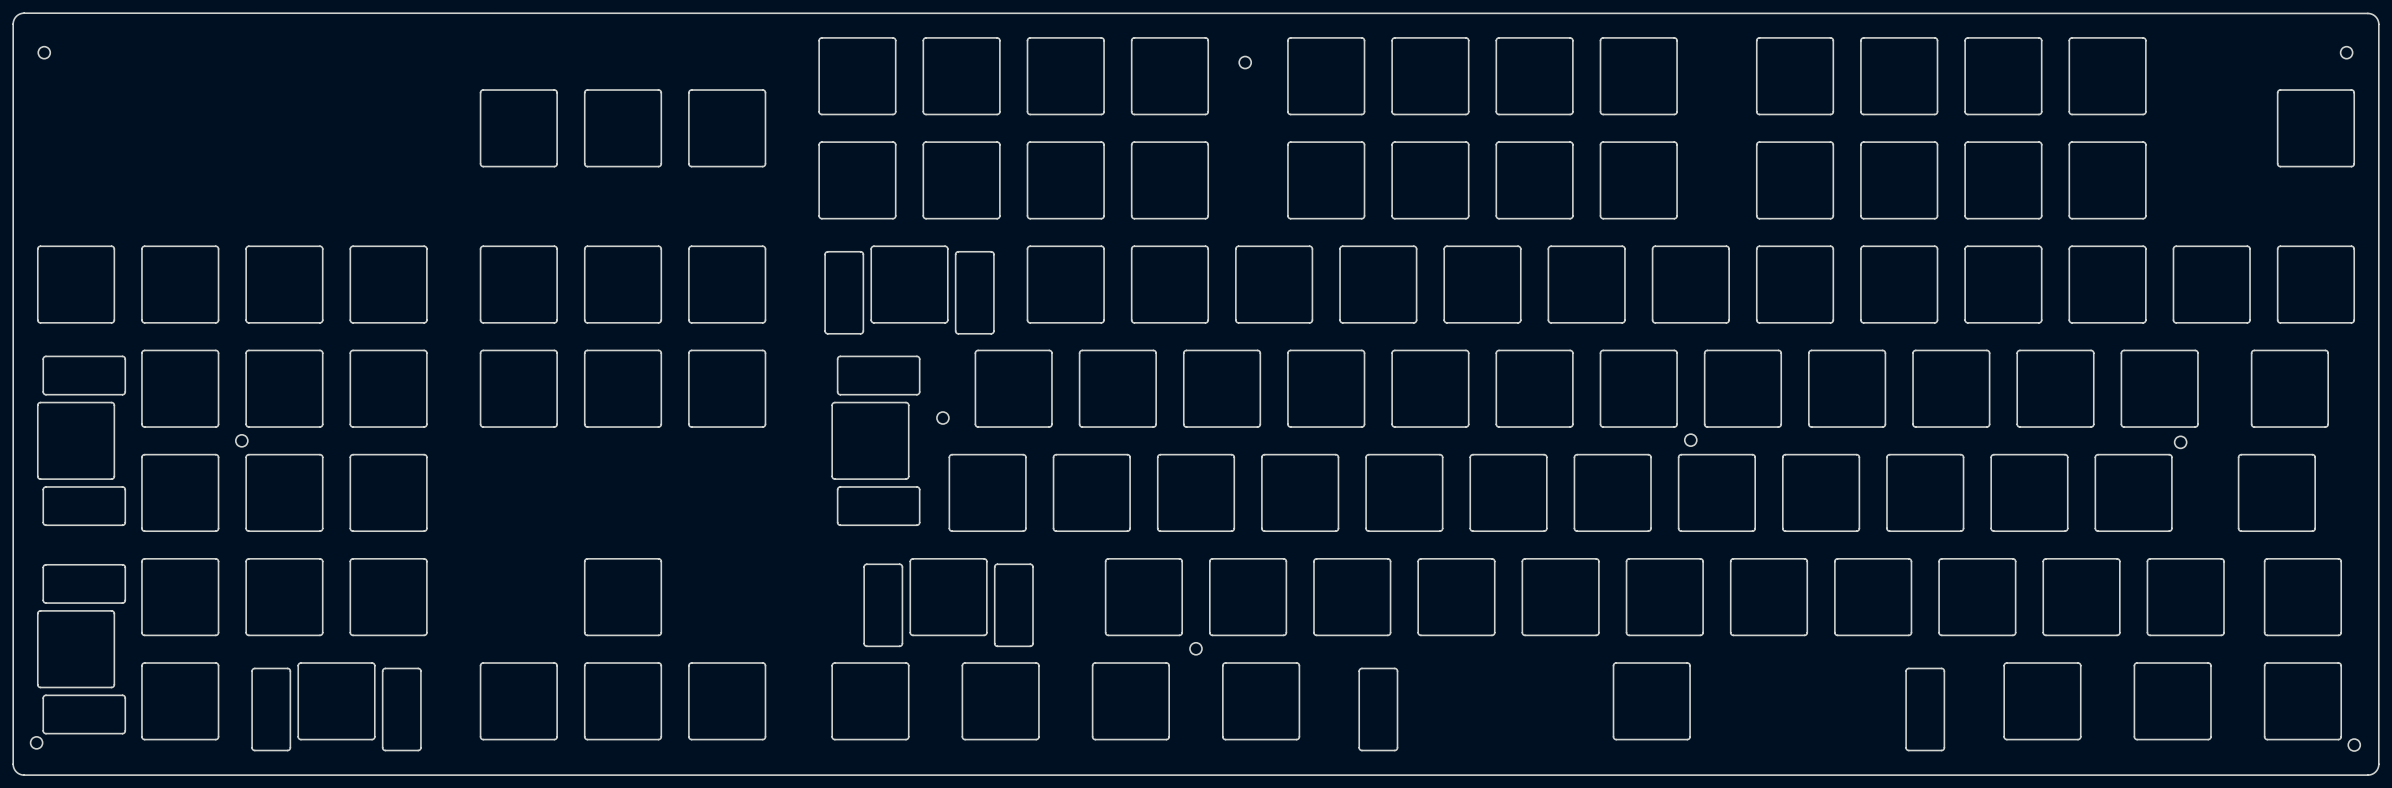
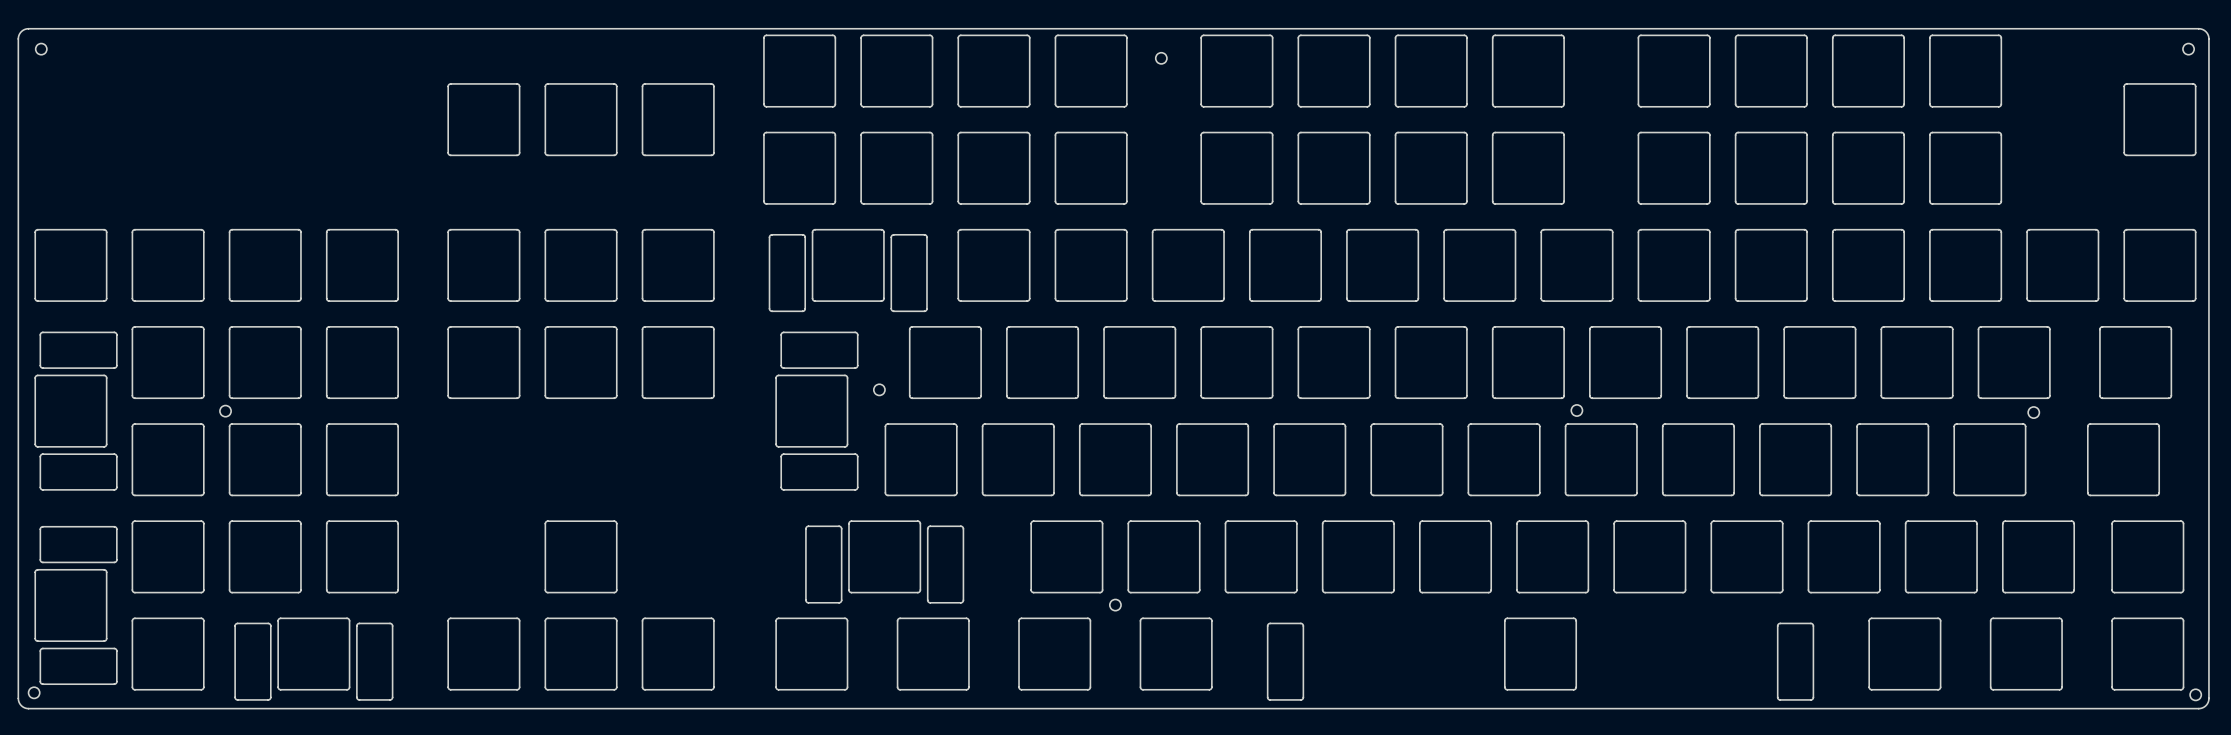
board edge: (24, 13) (2370, 13) (2376, 17) (2378, 24) (2378, 767) (2374, 772) (2367, 775) (21, 774) (15, 770) (13, 764) (13, 24) (16, 16) (24, 13) -> (2198, 28) (2205, 31) (2208, 38) (2208, 698) (2206, 704) (2201, 708) (28, 708) (22, 706) (18, 701) (18, 38) (20, 32) (25, 29) (2198, 28)

